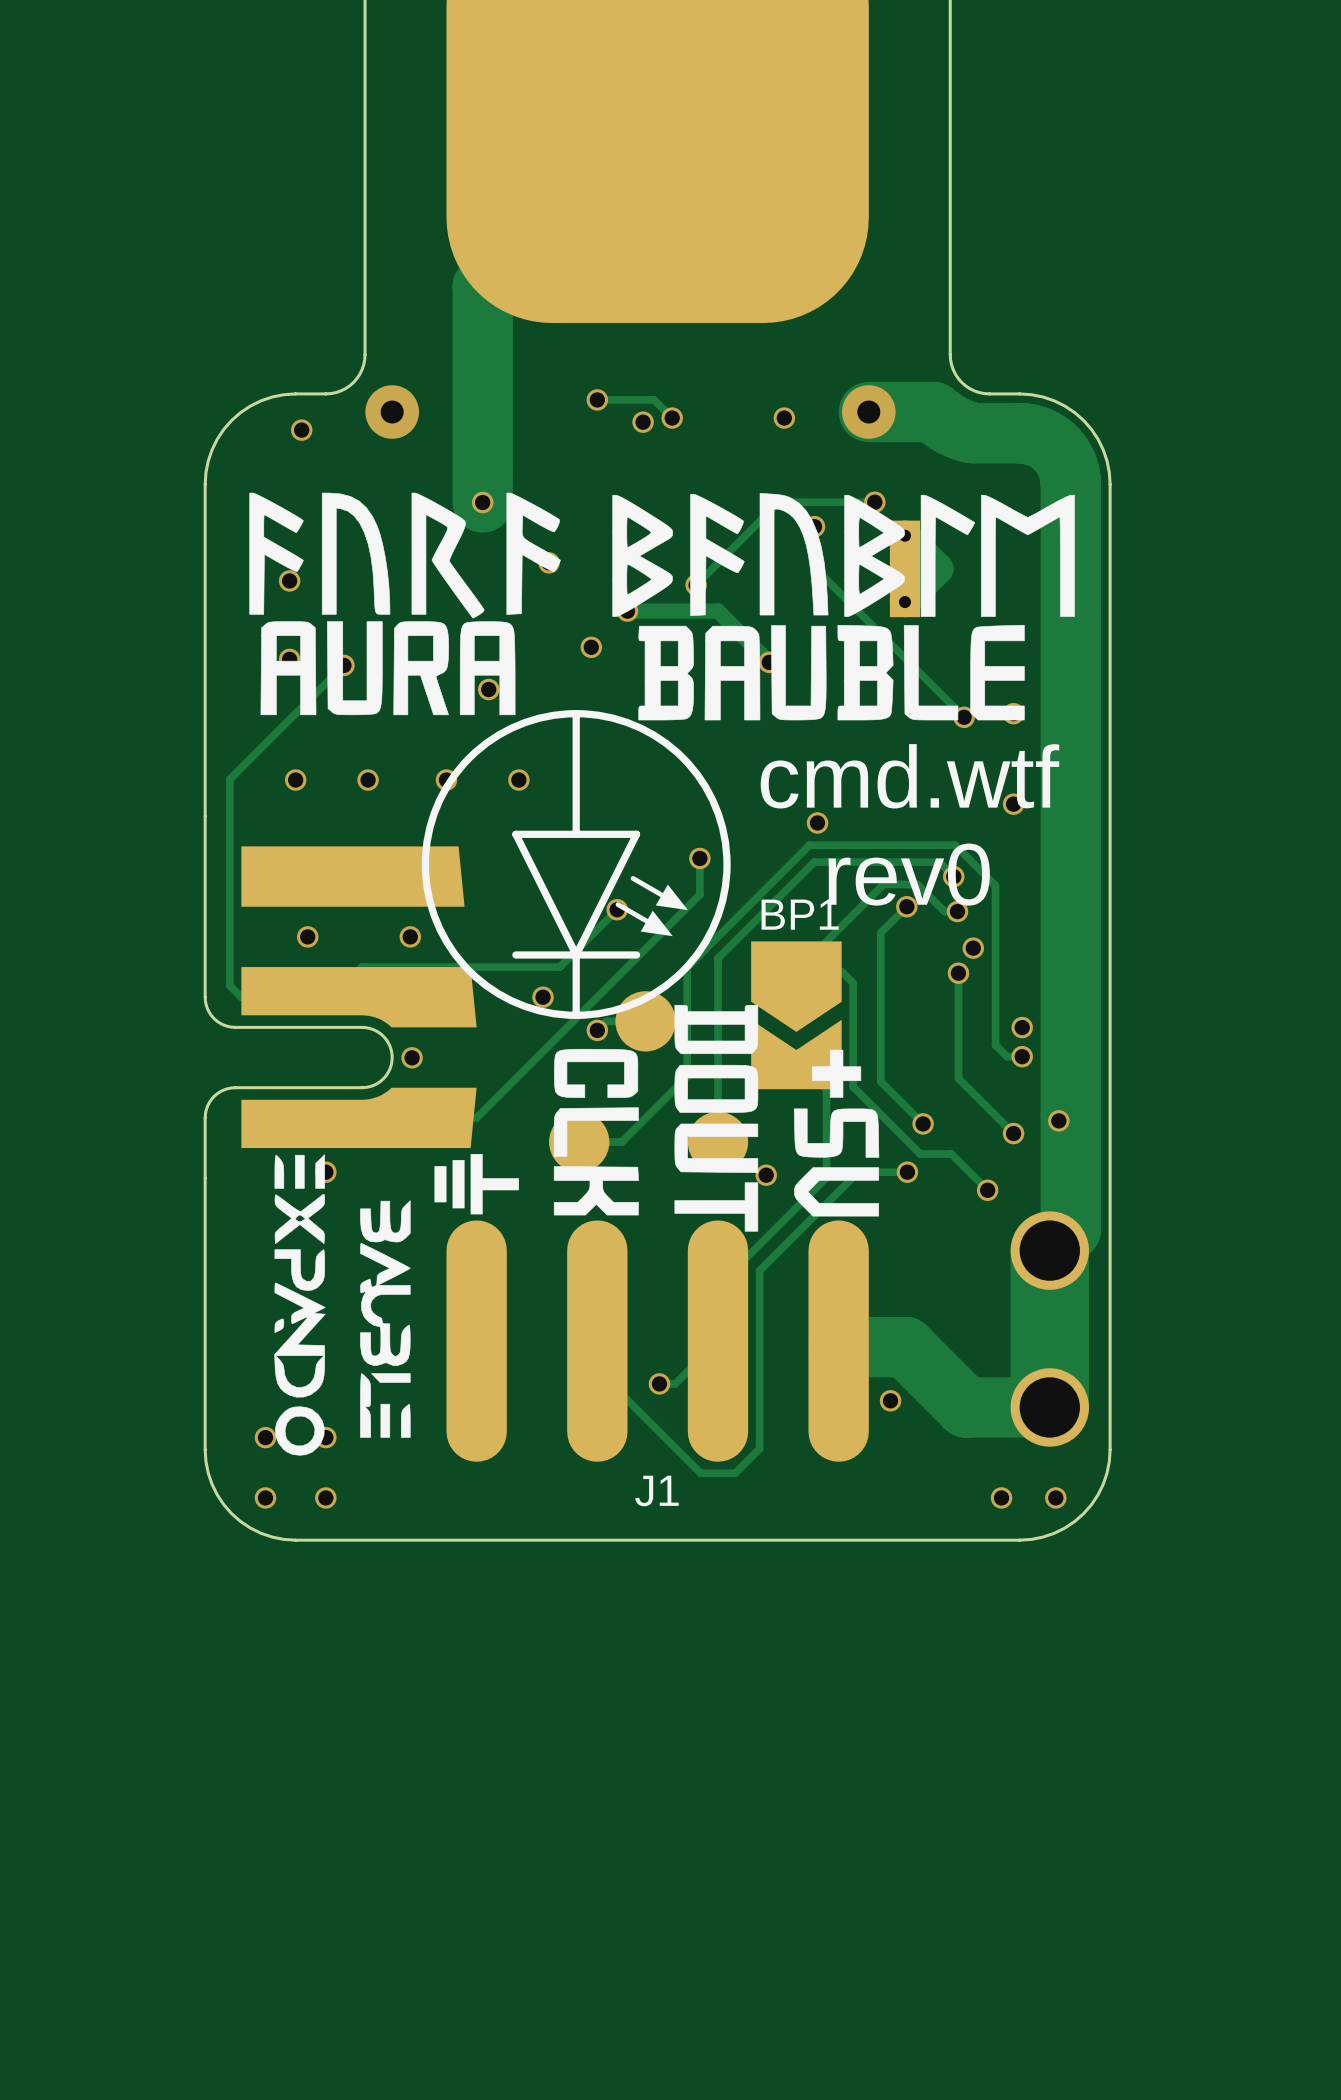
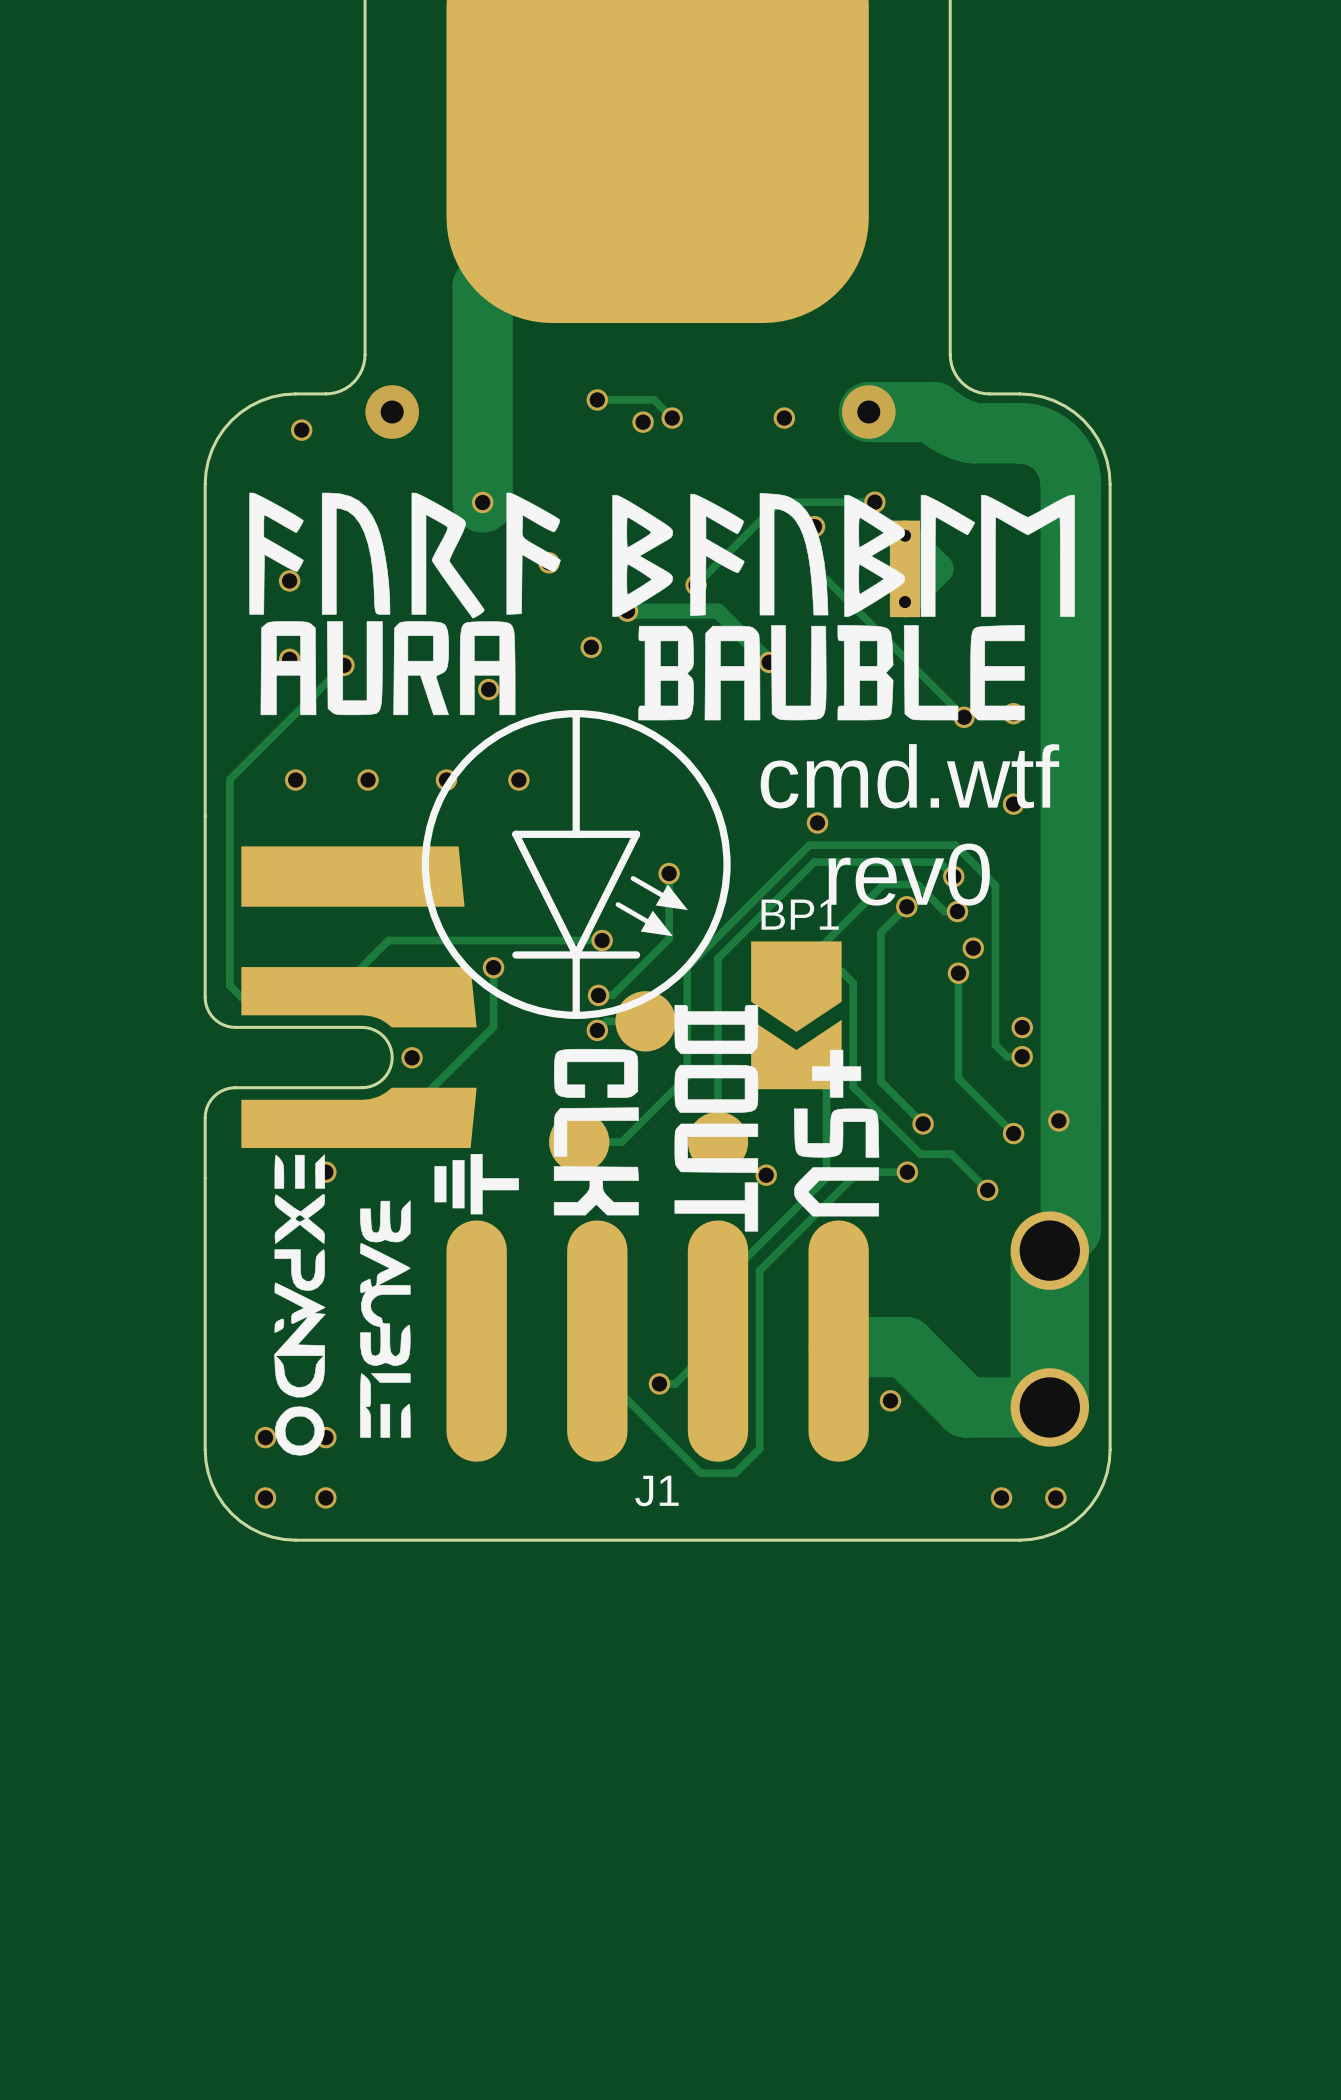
track: (699, 858) (699, 894) (476, 1117) (402, 1117) -> (493, 967) (493, 1026) (402, 1117)
via: (699, 858) -> none
track: none -> (669, 873) (669, 938) (612, 995) (598, 995)
via: none -> (669, 873)
track: (617, 909) (559, 967) (362, 967) -> (602, 940) (388, 940) (362, 967)
via: (617, 909) -> none
via: (307, 936) -> none
via: (410, 936) -> none
via: none -> (602, 940)
via: none -> (493, 967)
via: none -> (598, 995)
via: (543, 997) -> none

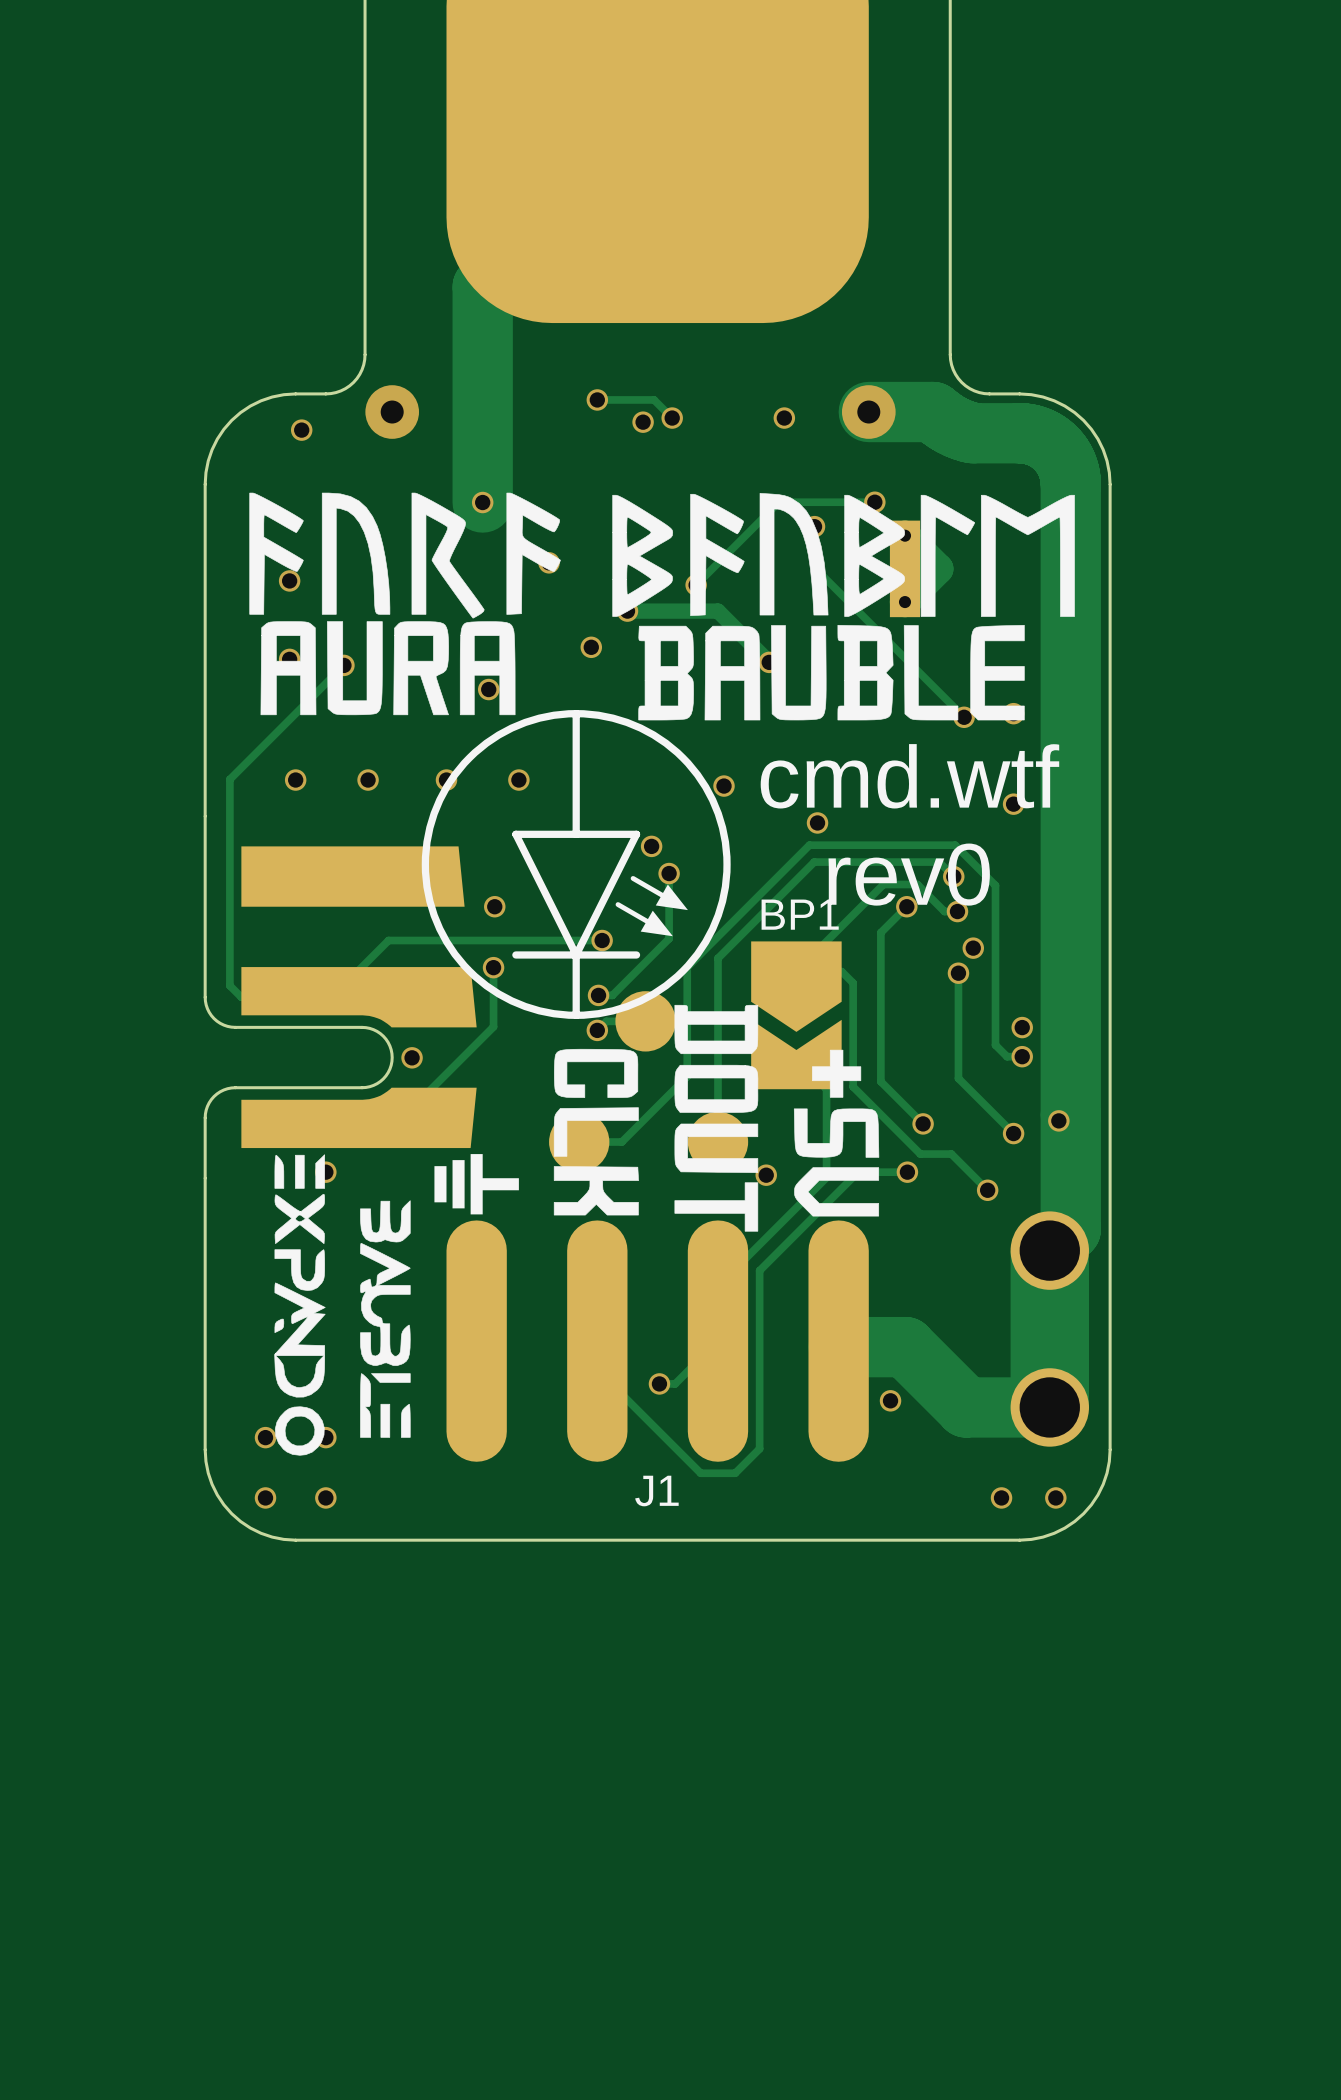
via: none -> (724, 786)
via: none -> (651, 846)
via: none -> (494, 906)

